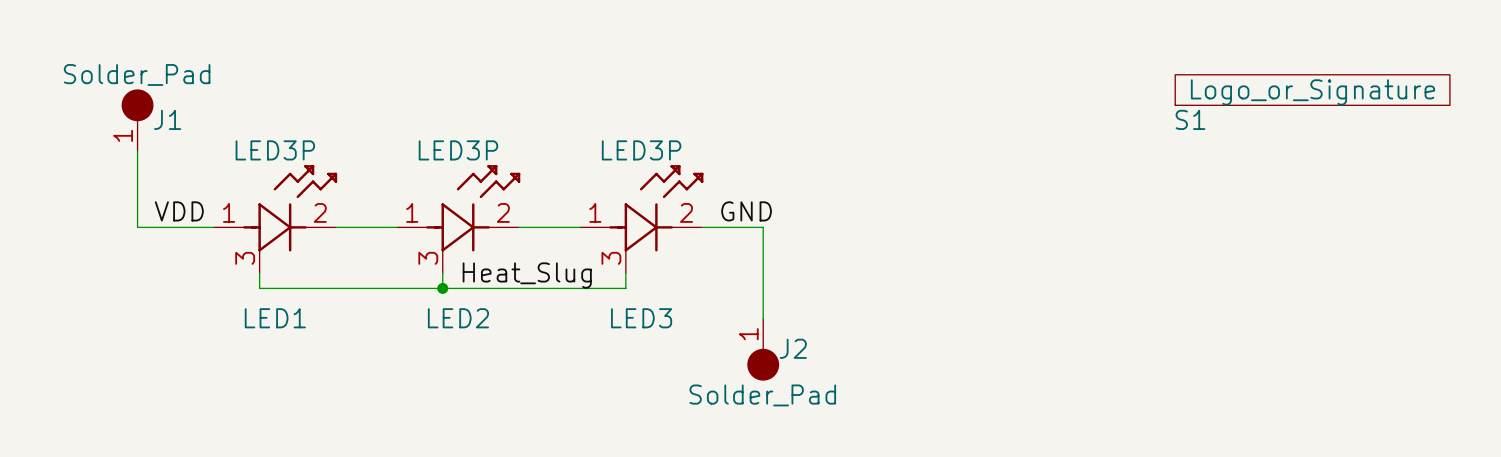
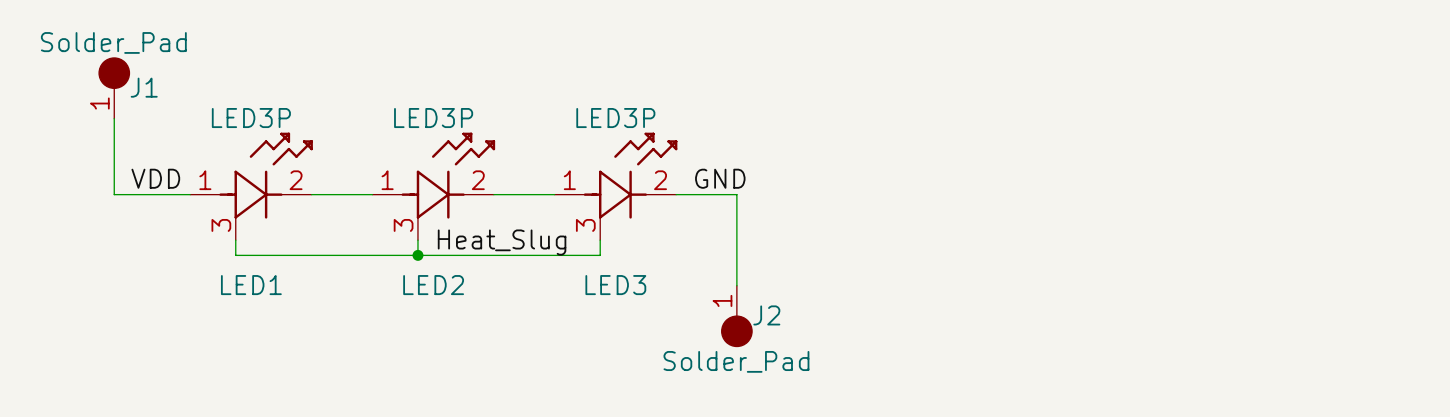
S1: Logo_or_Signature (1312, 90) -> none

